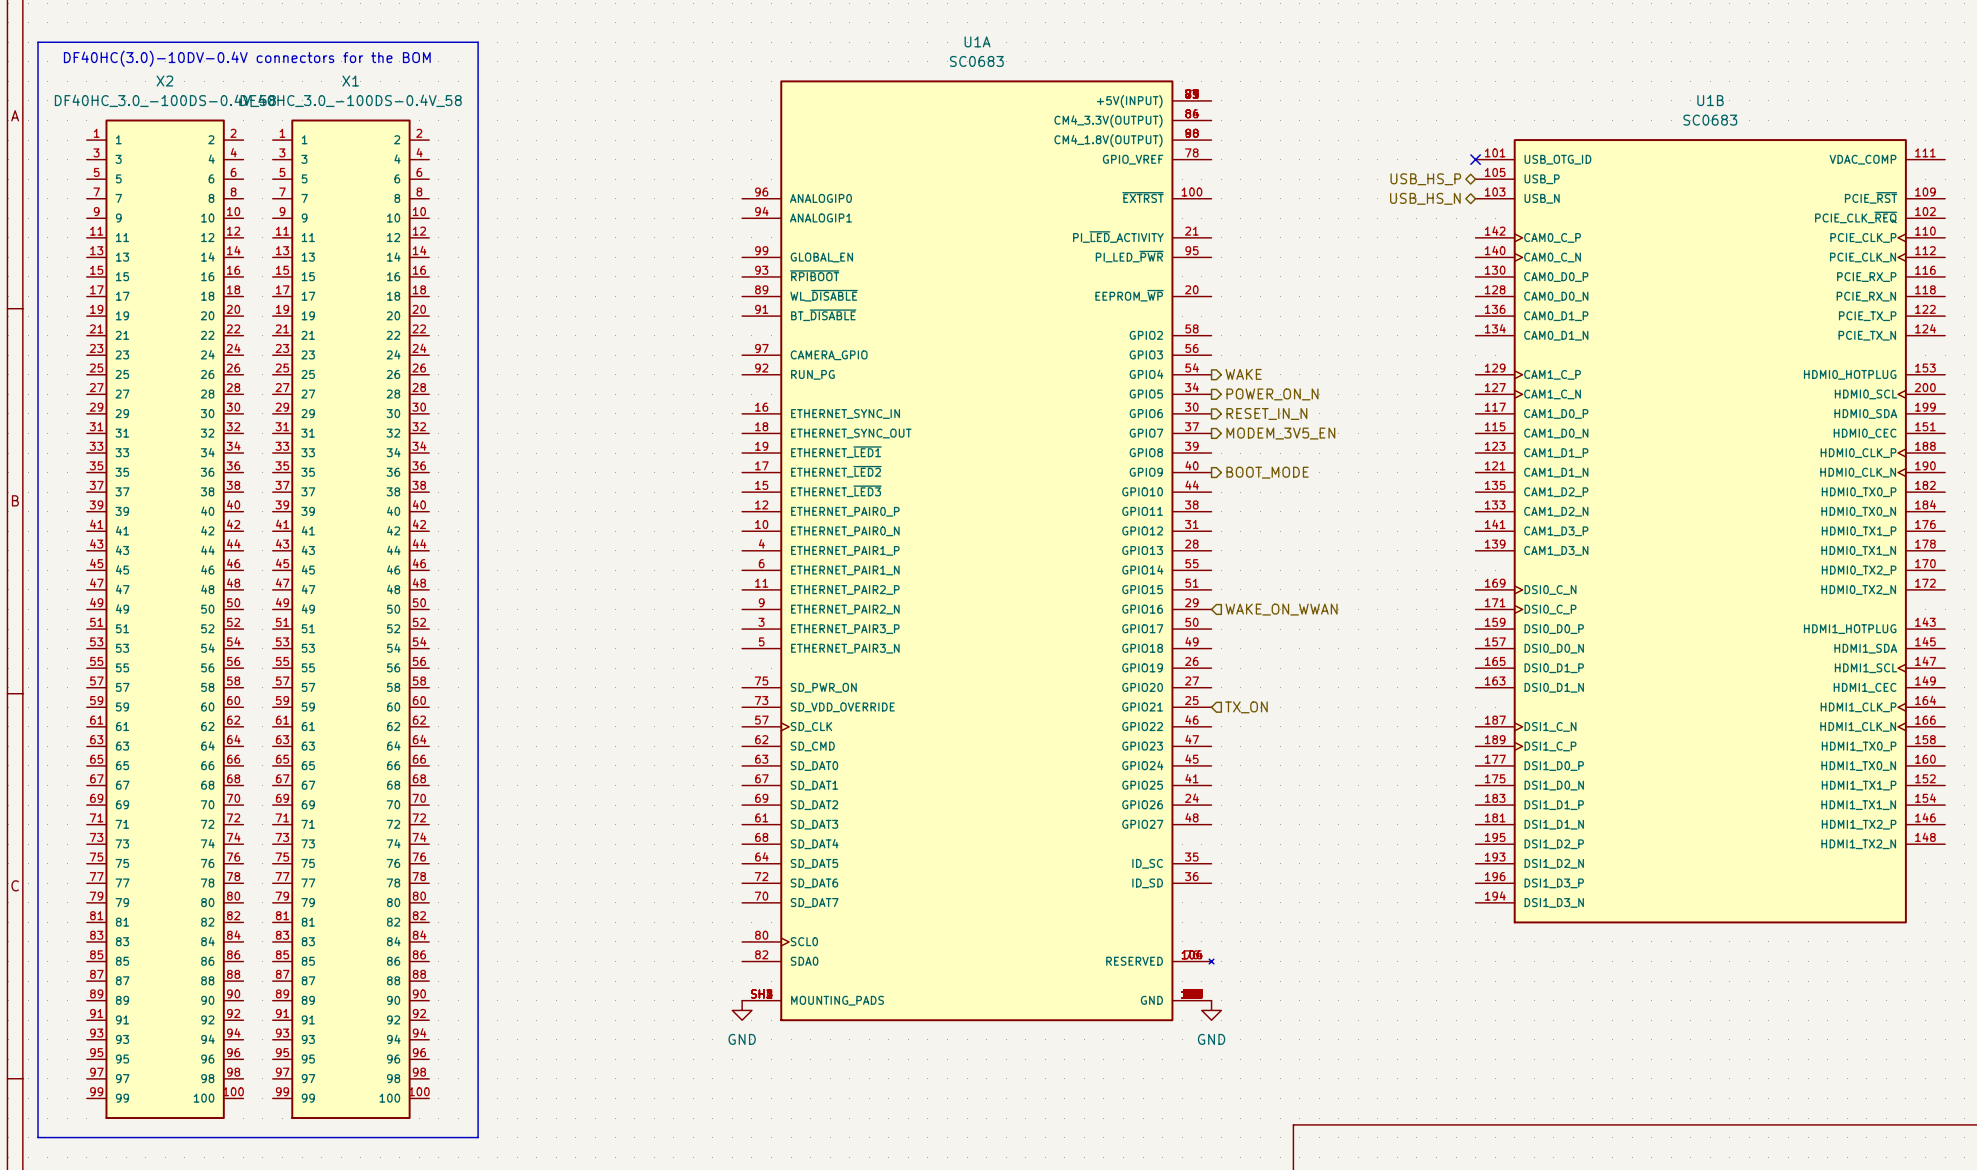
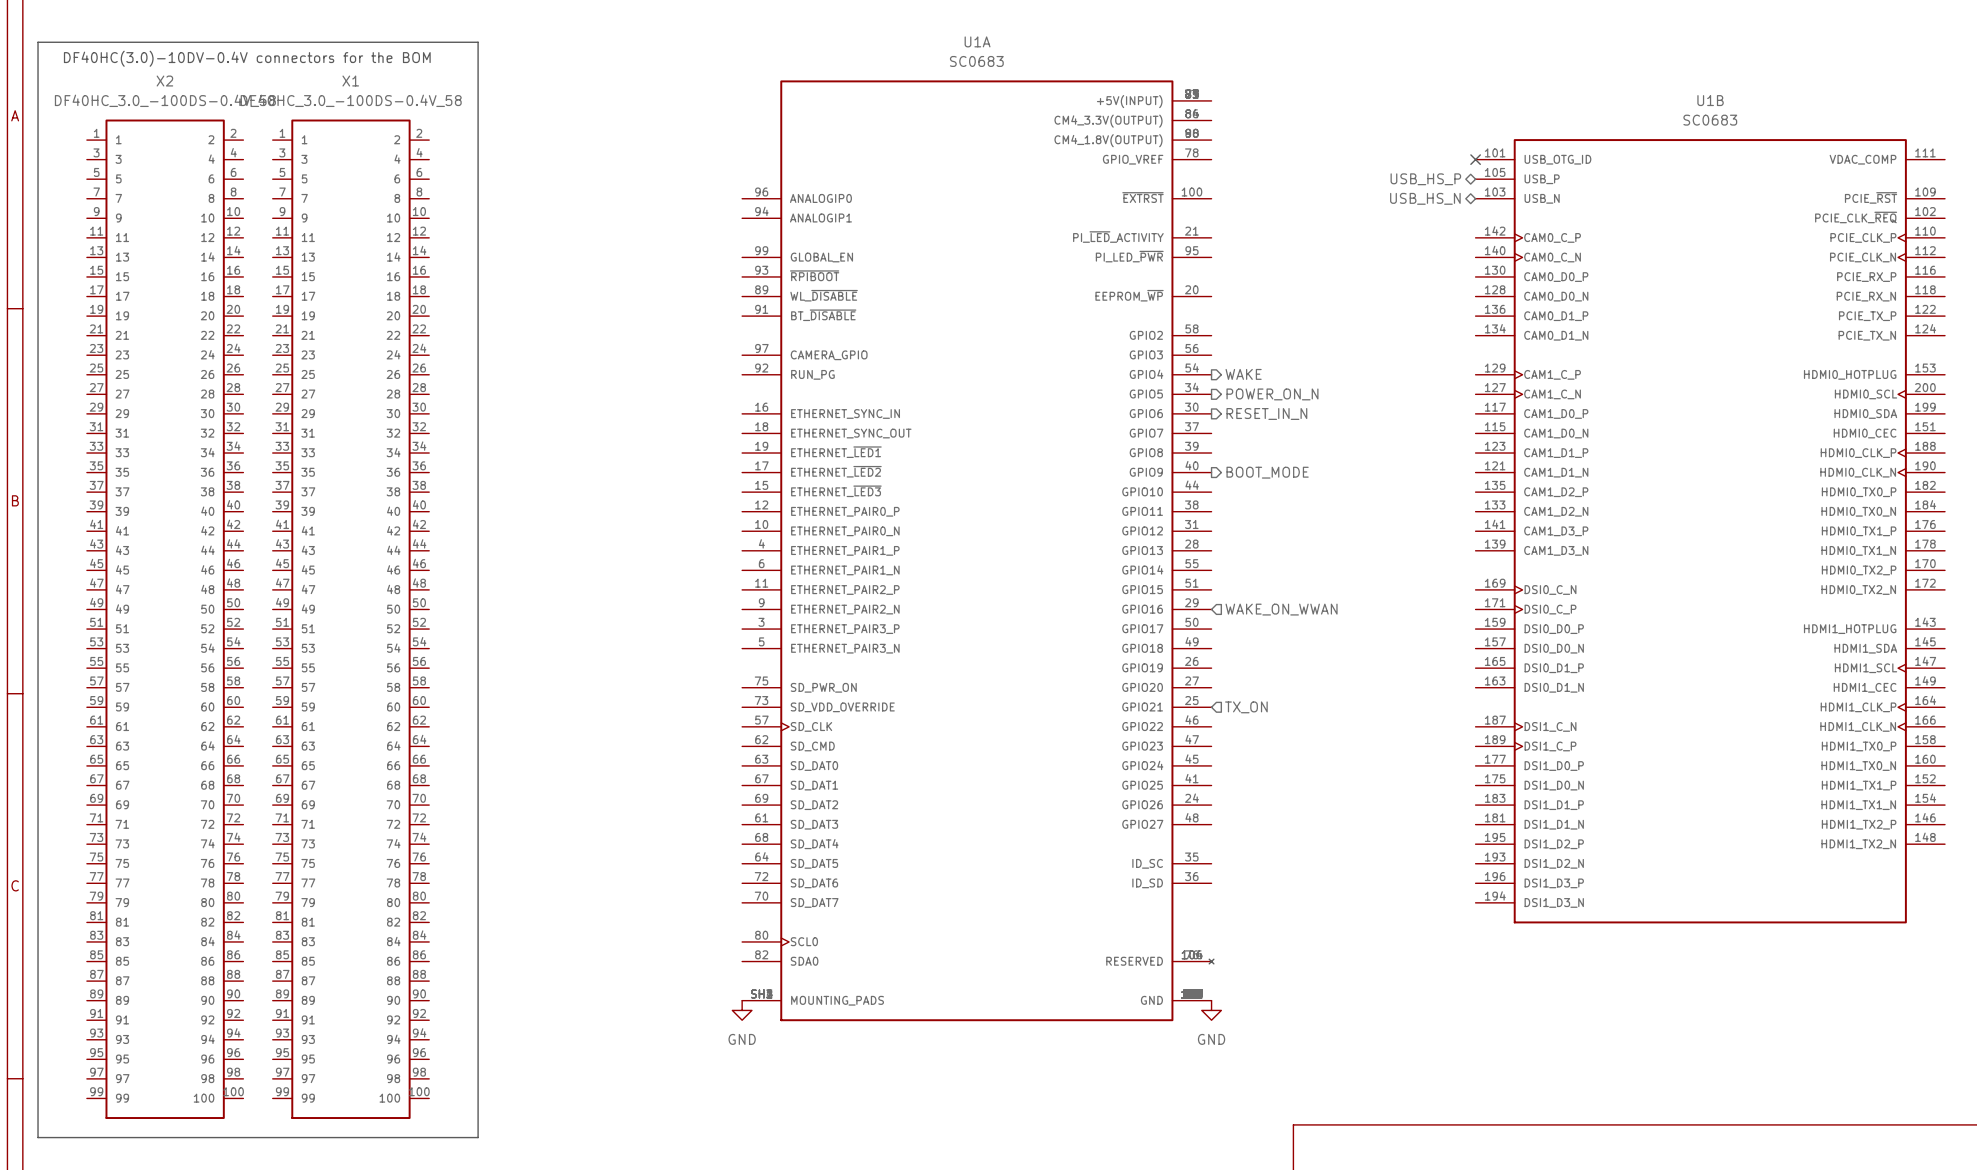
hierarchical label: MODEM_3V5_EN (1280, 433) -> none

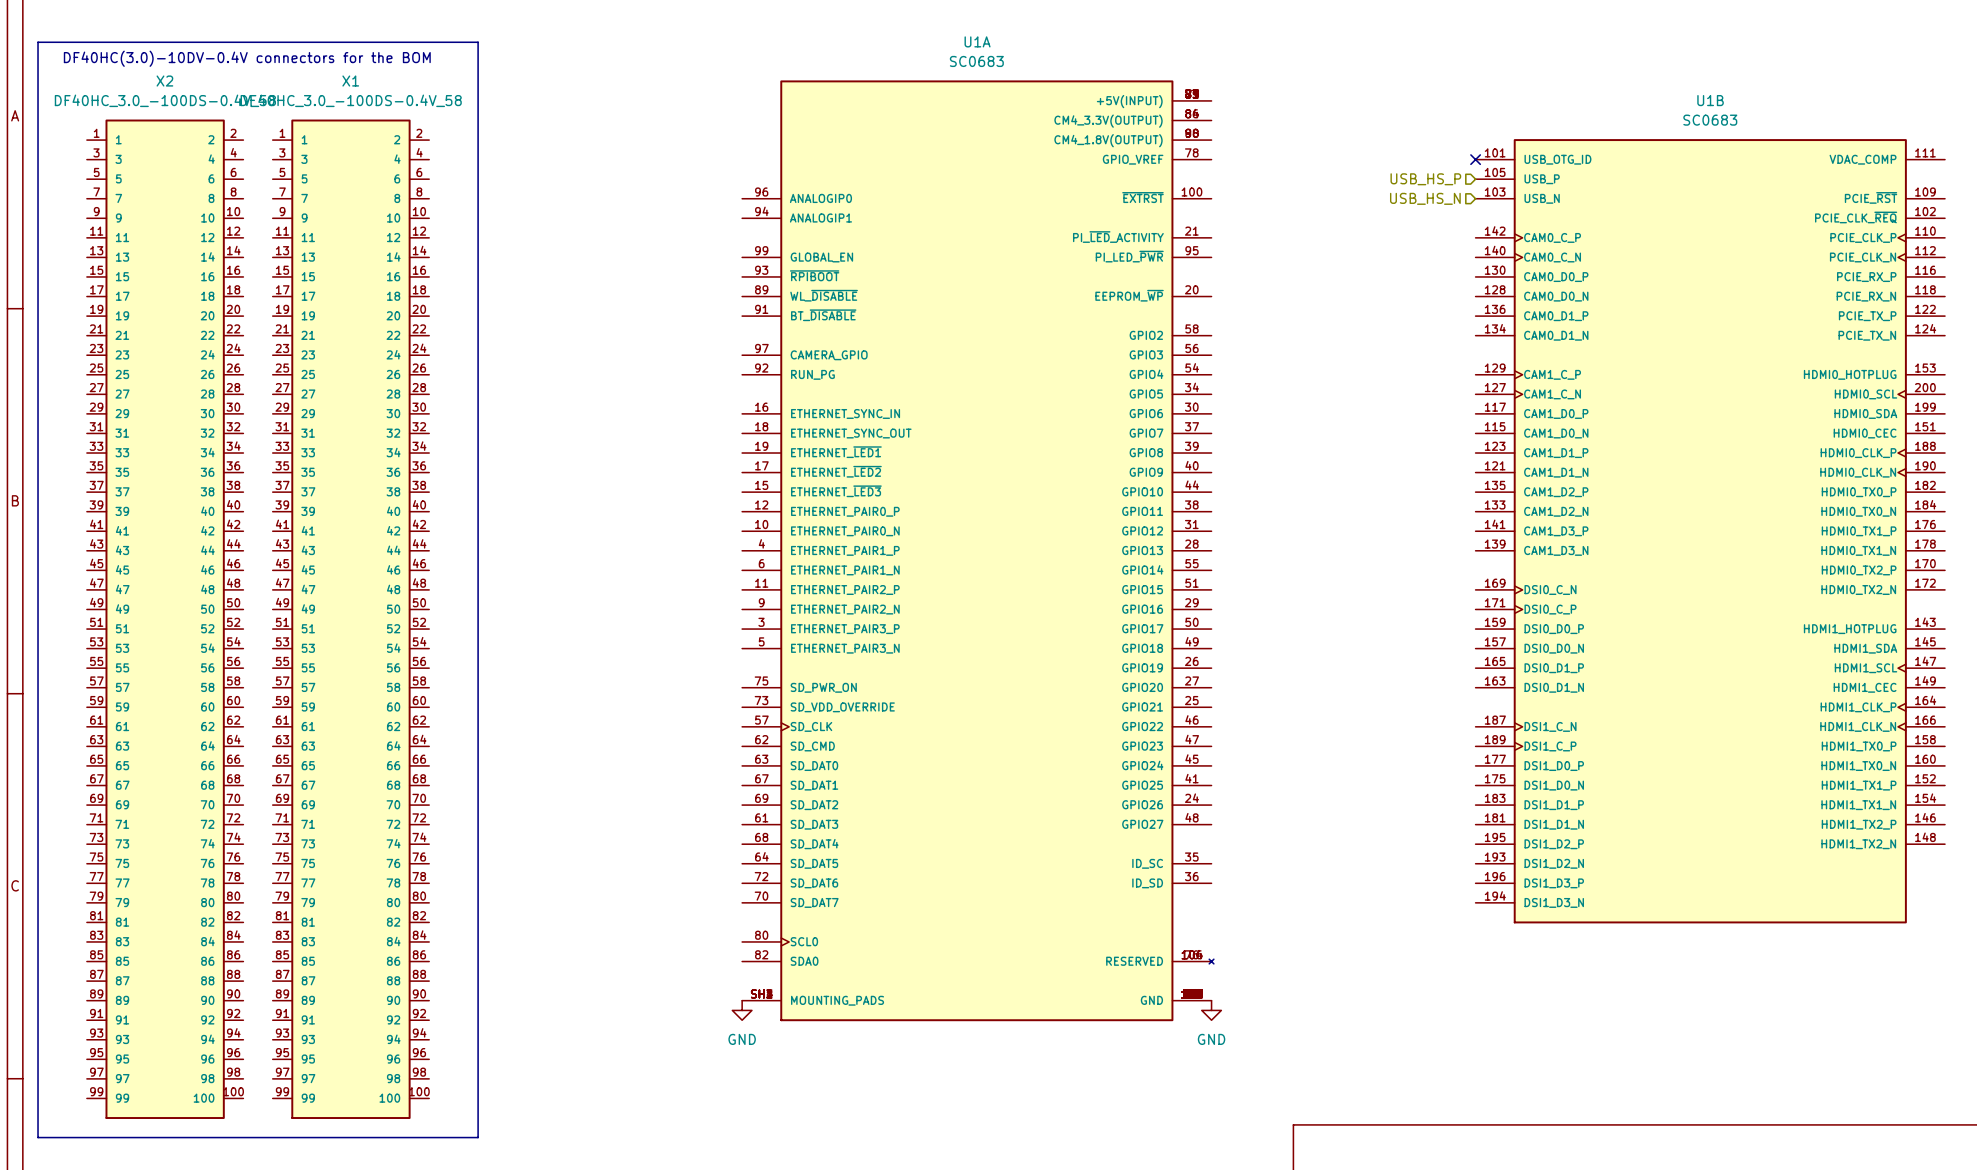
hierarchical label shape: bidirectional (1425, 179) -> input (1425, 179)
hierarchical label shape: bidirectional (1425, 198) -> input (1425, 198)
hierarchical label: WAKE (1243, 374) -> none
hierarchical label: POWER_ON_N (1272, 394) -> none
hierarchical label: RESET_IN_N (1266, 413) -> none
hierarchical label: BOOT_MODE (1267, 472) -> none
hierarchical label: WAKE_ON_WWAN (1281, 609) -> none
hierarchical label: TX_ON (1246, 707) -> none

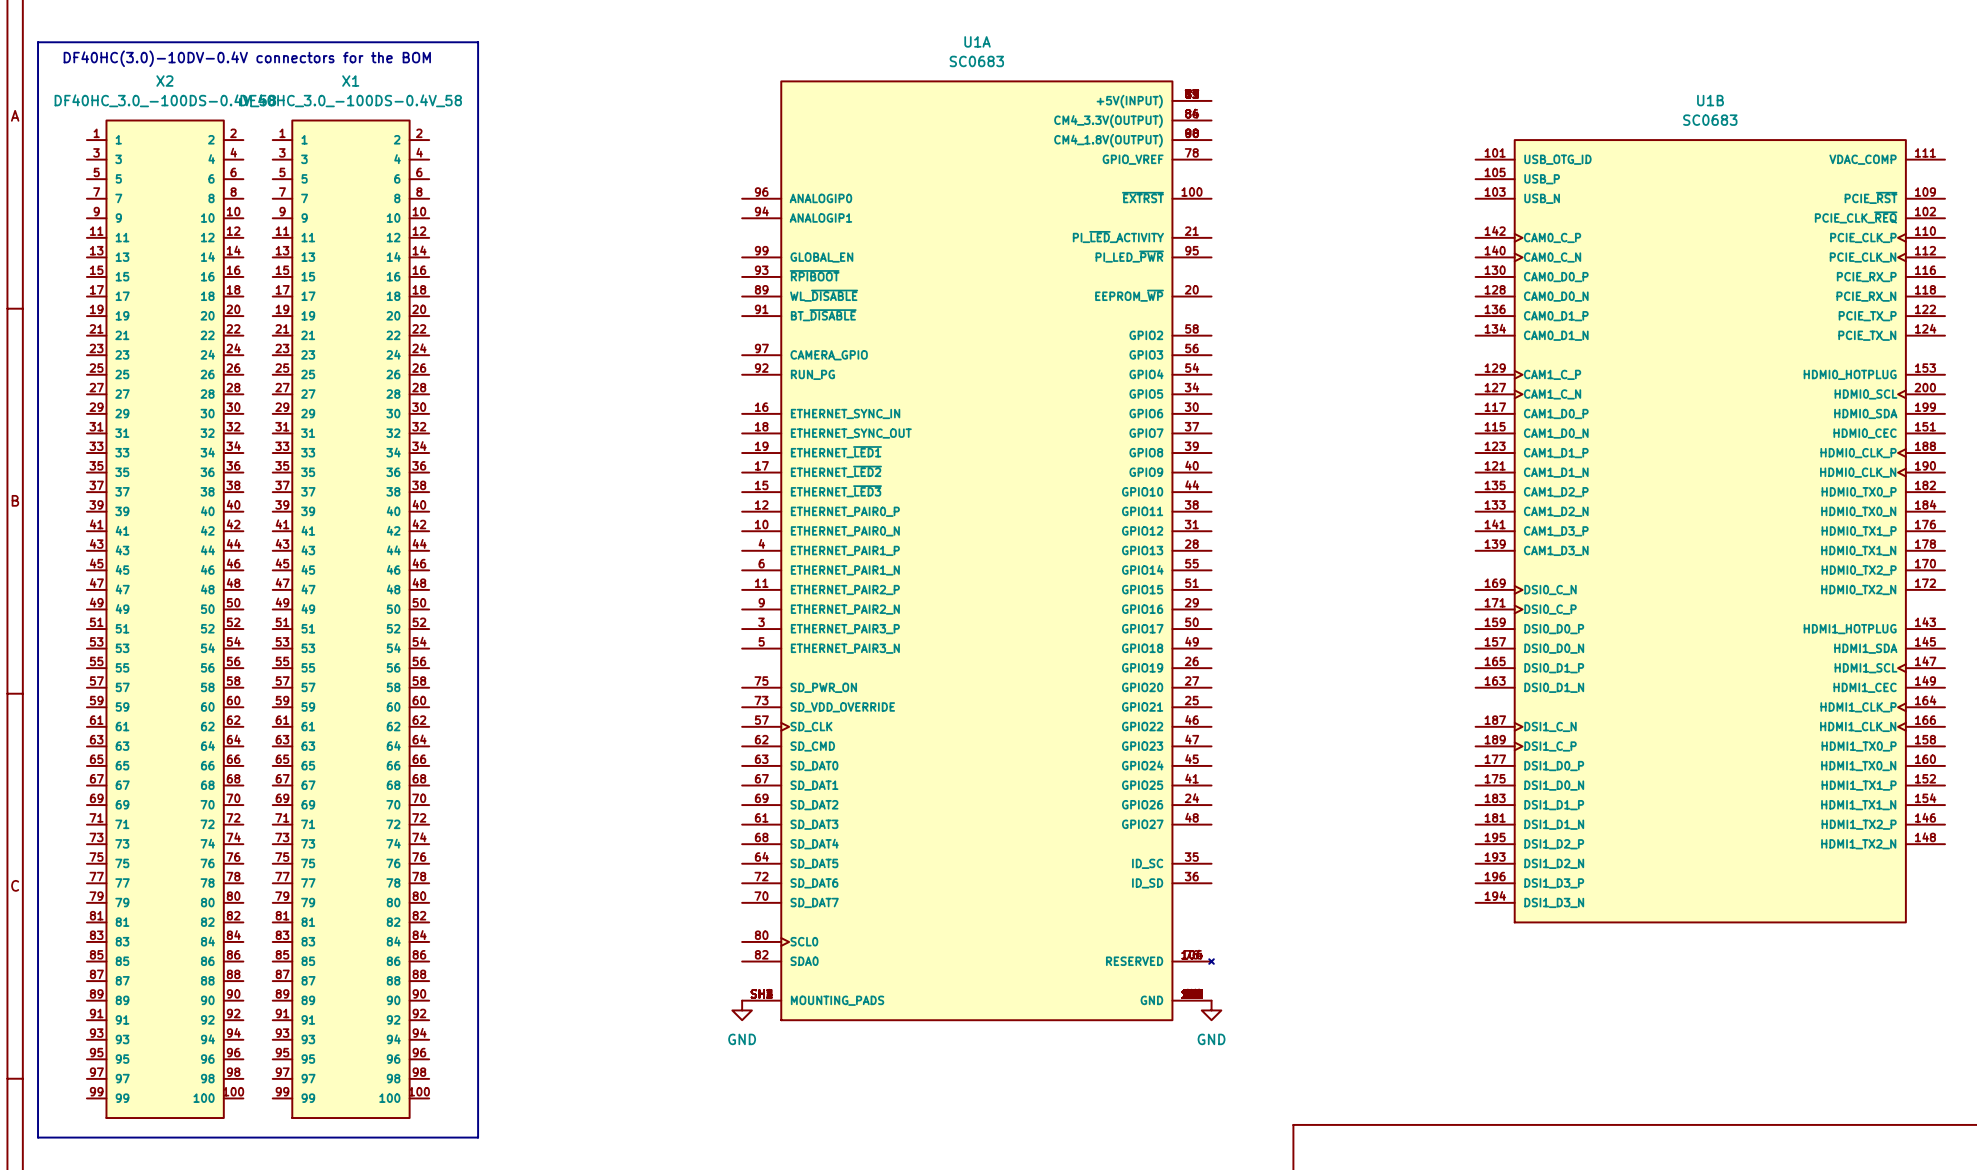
no-connect mark: (1475, 159) -> none
hierarchical label: USB_HS_P (1425, 179) -> none
hierarchical label: USB_HS_N (1425, 198) -> none

